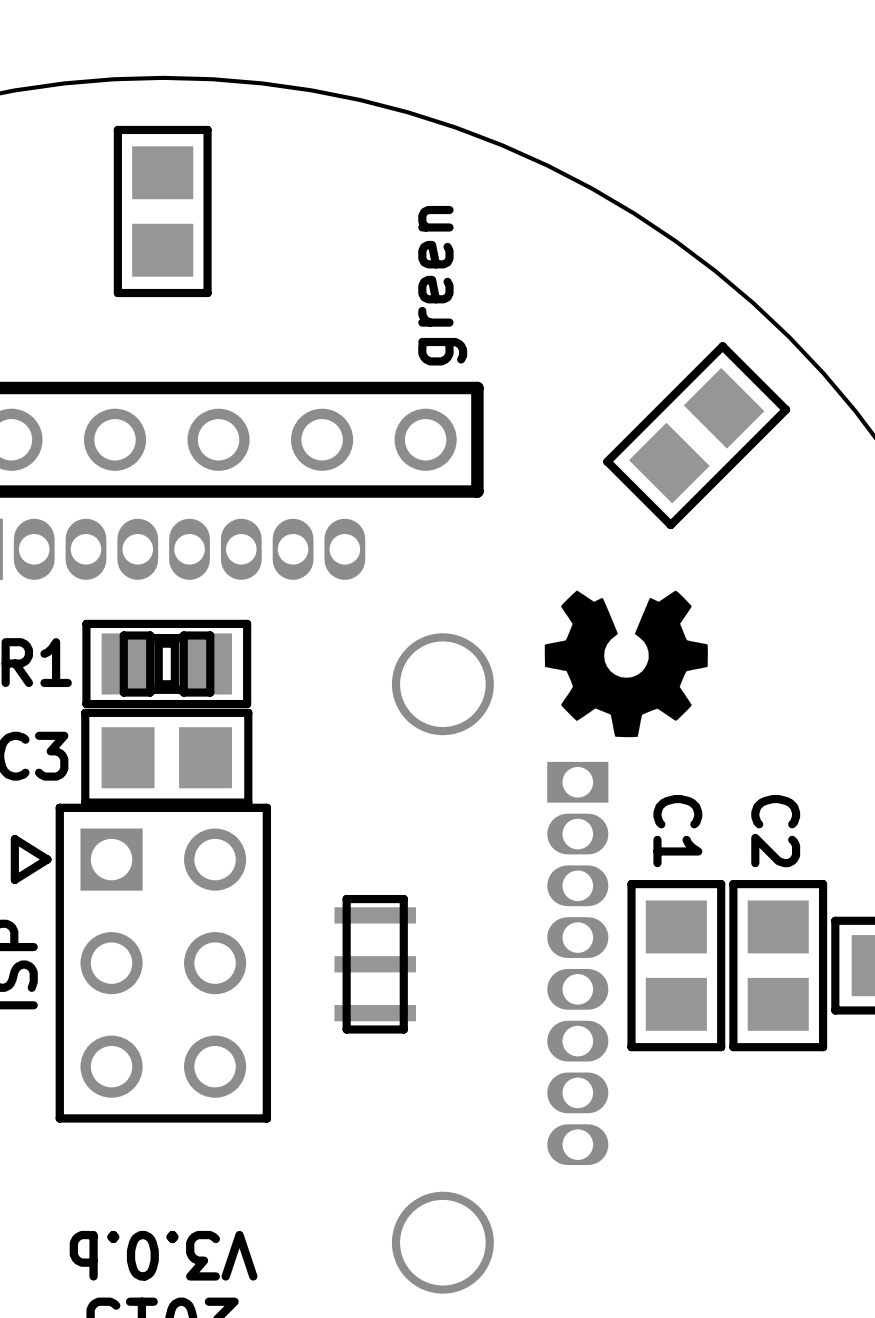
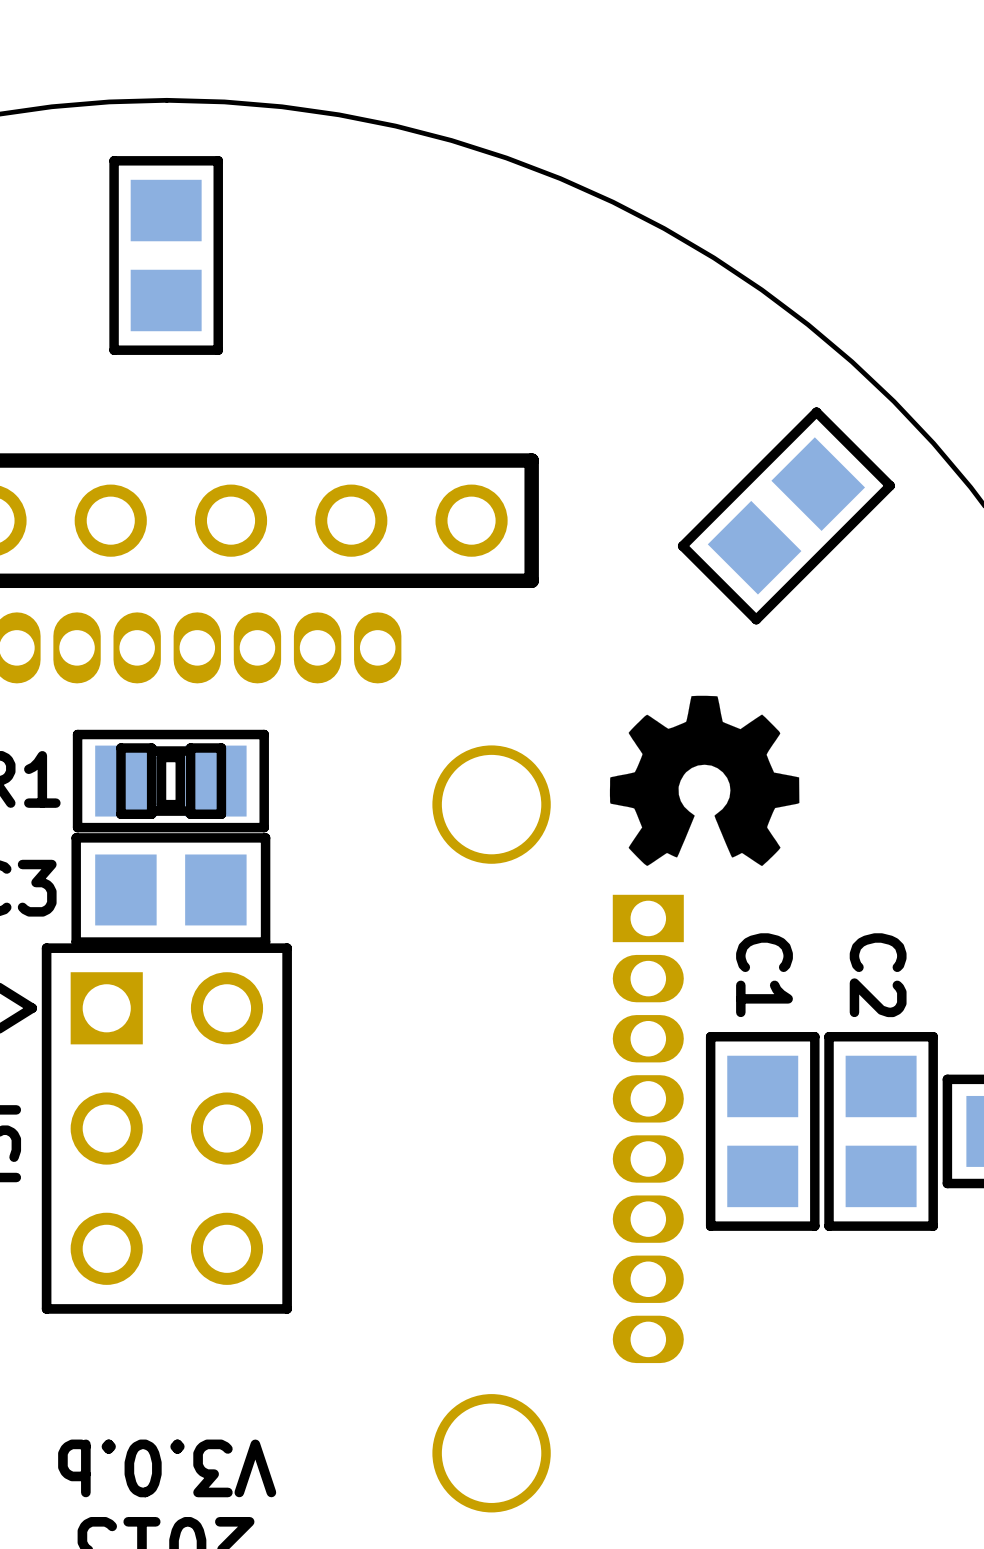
text: green (442, 285) -> none
drawing shape: [544, 590, 708, 738] -> [609, 695, 800, 867]
part: (375, 964) -> none

